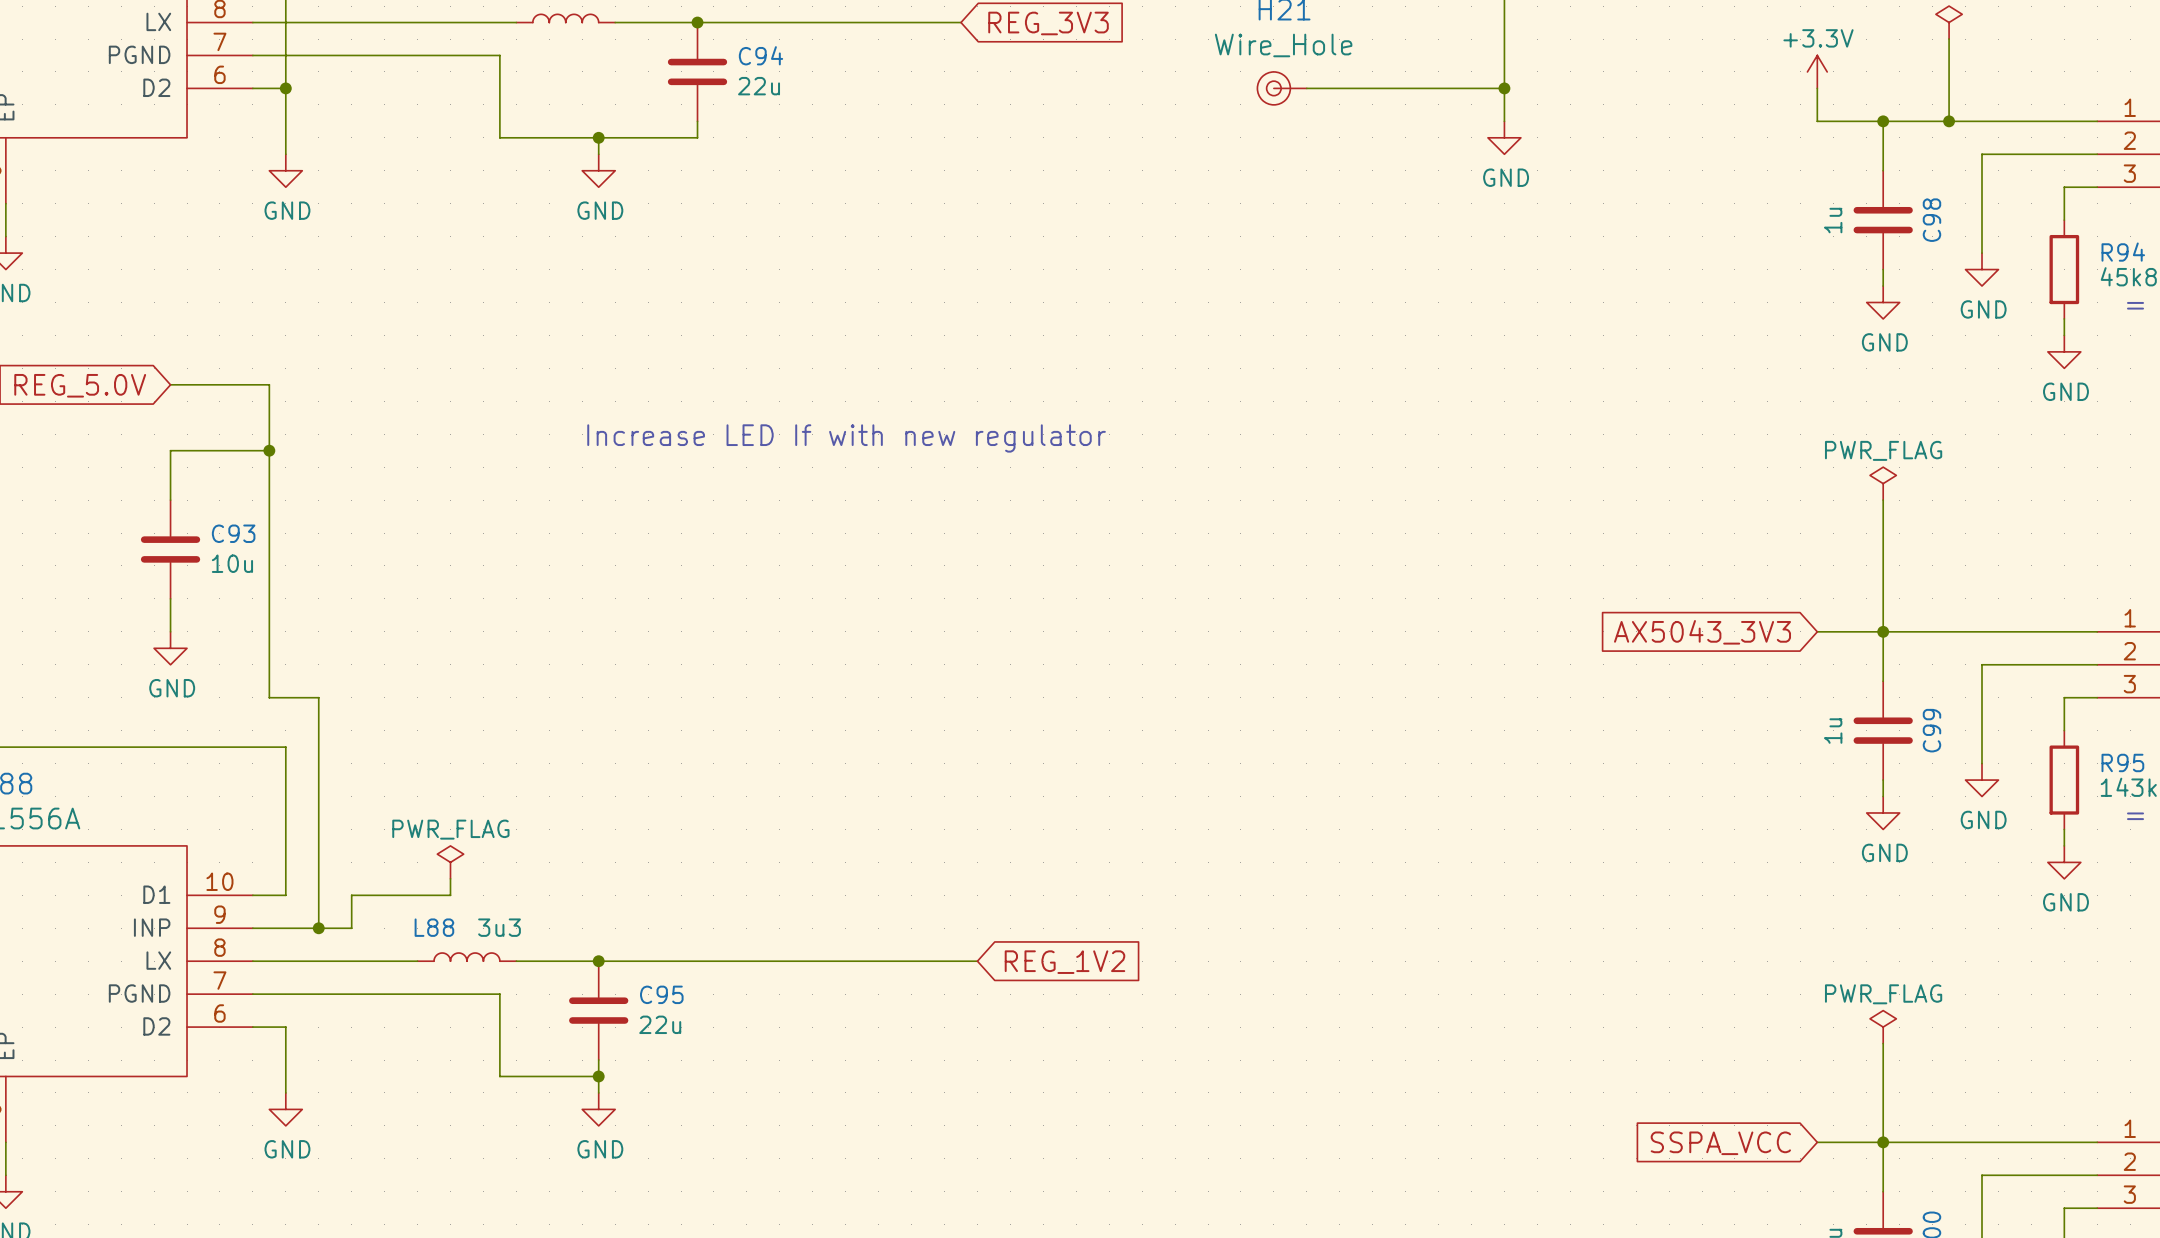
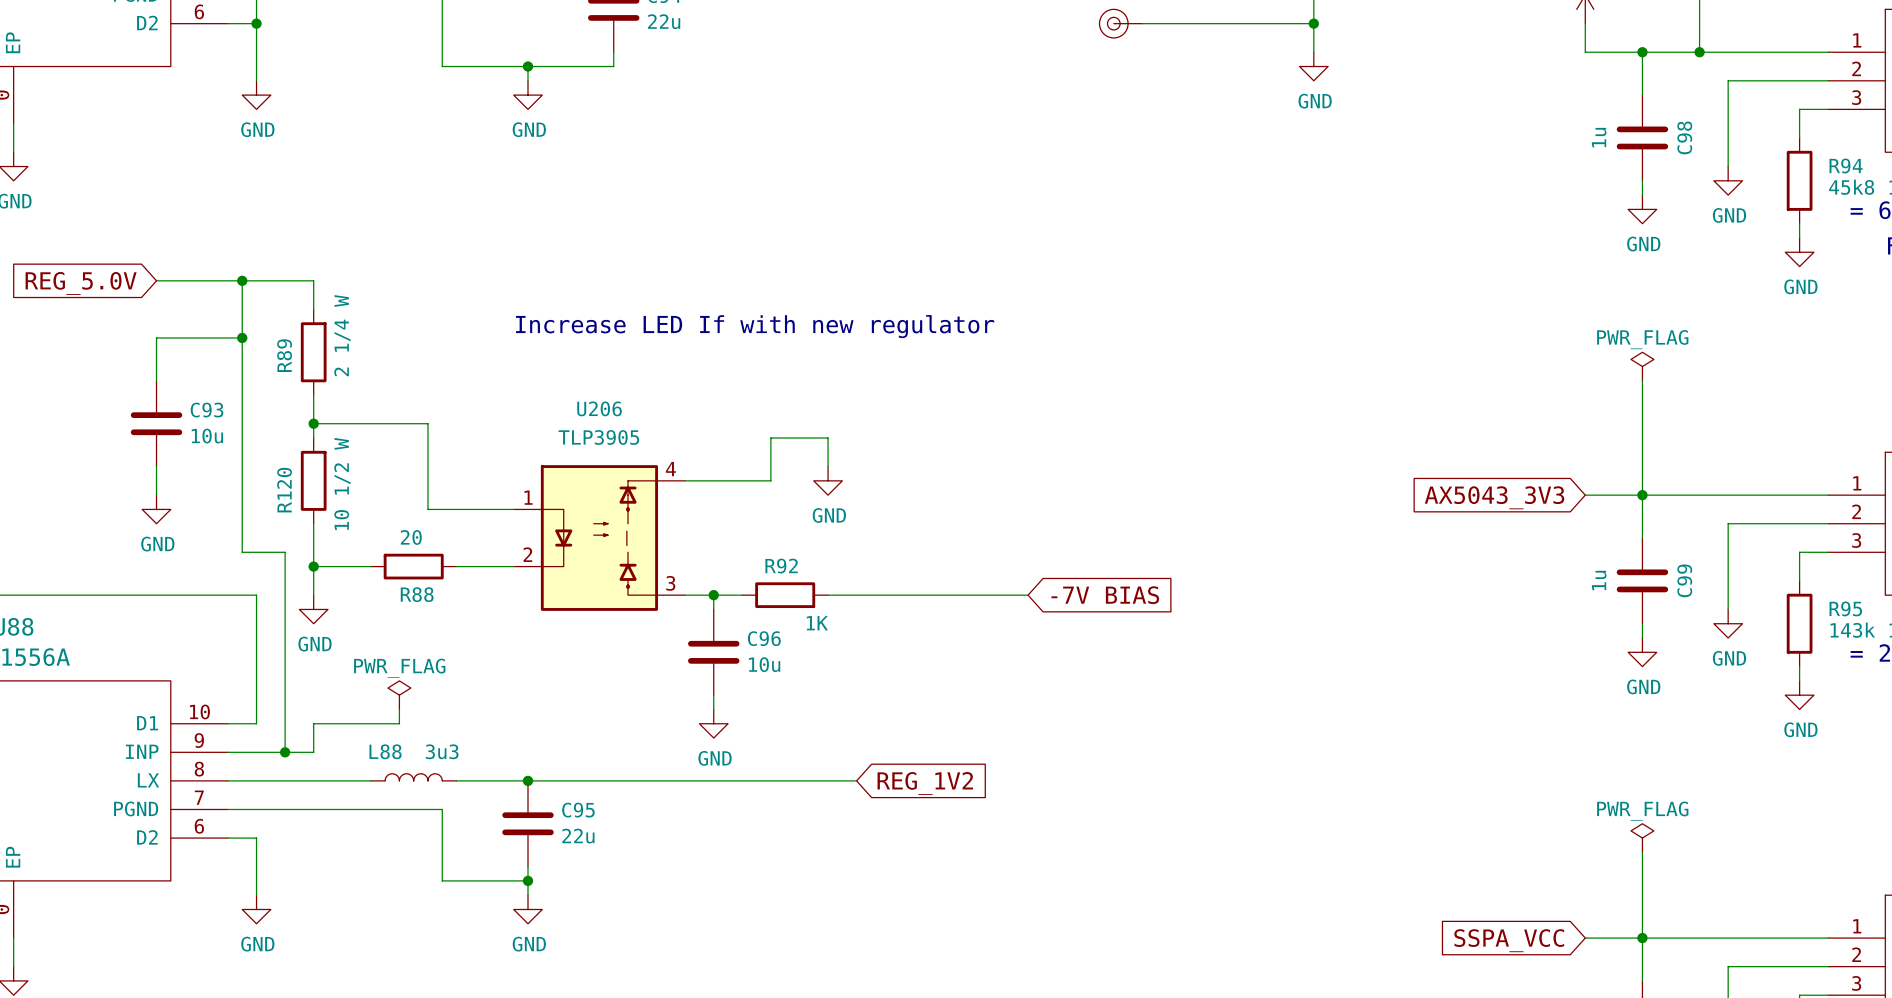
wire: none -> (242, 280) (313, 280) (313, 309)
junction: none -> (242, 280)
R89: none -> 2 1/4 W (313, 352)
wire: none -> (313, 395) (313, 438)
wire: none -> (313, 423) (427, 423) (427, 509) (513, 509)
junction: none -> (313, 423)
wire: none -> (828, 466) (828, 438) (770, 438) (770, 480) (685, 480)
R120: none -> 10 1/2 W (313, 480)
power symbol: none -> GND (828, 480)
wire: none -> (313, 523) (313, 595)
U206: none -> TLP3905 (599, 538)
wire: none -> (313, 566) (370, 566)
junction: none -> (313, 566)
R88: none -> 20 (413, 566)
wire: none -> (456, 566) (513, 566)
wire: none -> (685, 595) (742, 595)
wire: none -> (713, 595) (713, 609)
junction: none -> (713, 595)
R92: none -> 1K (785, 595)
wire: none -> (828, 595) (1028, 595)
global label: none -> -7V BIAS (1105, 595)
power symbol: none -> GND (313, 609)
C96: none -> 10u (713, 652)
wire: none -> (713, 695) (713, 709)
power symbol: none -> GND (713, 723)

